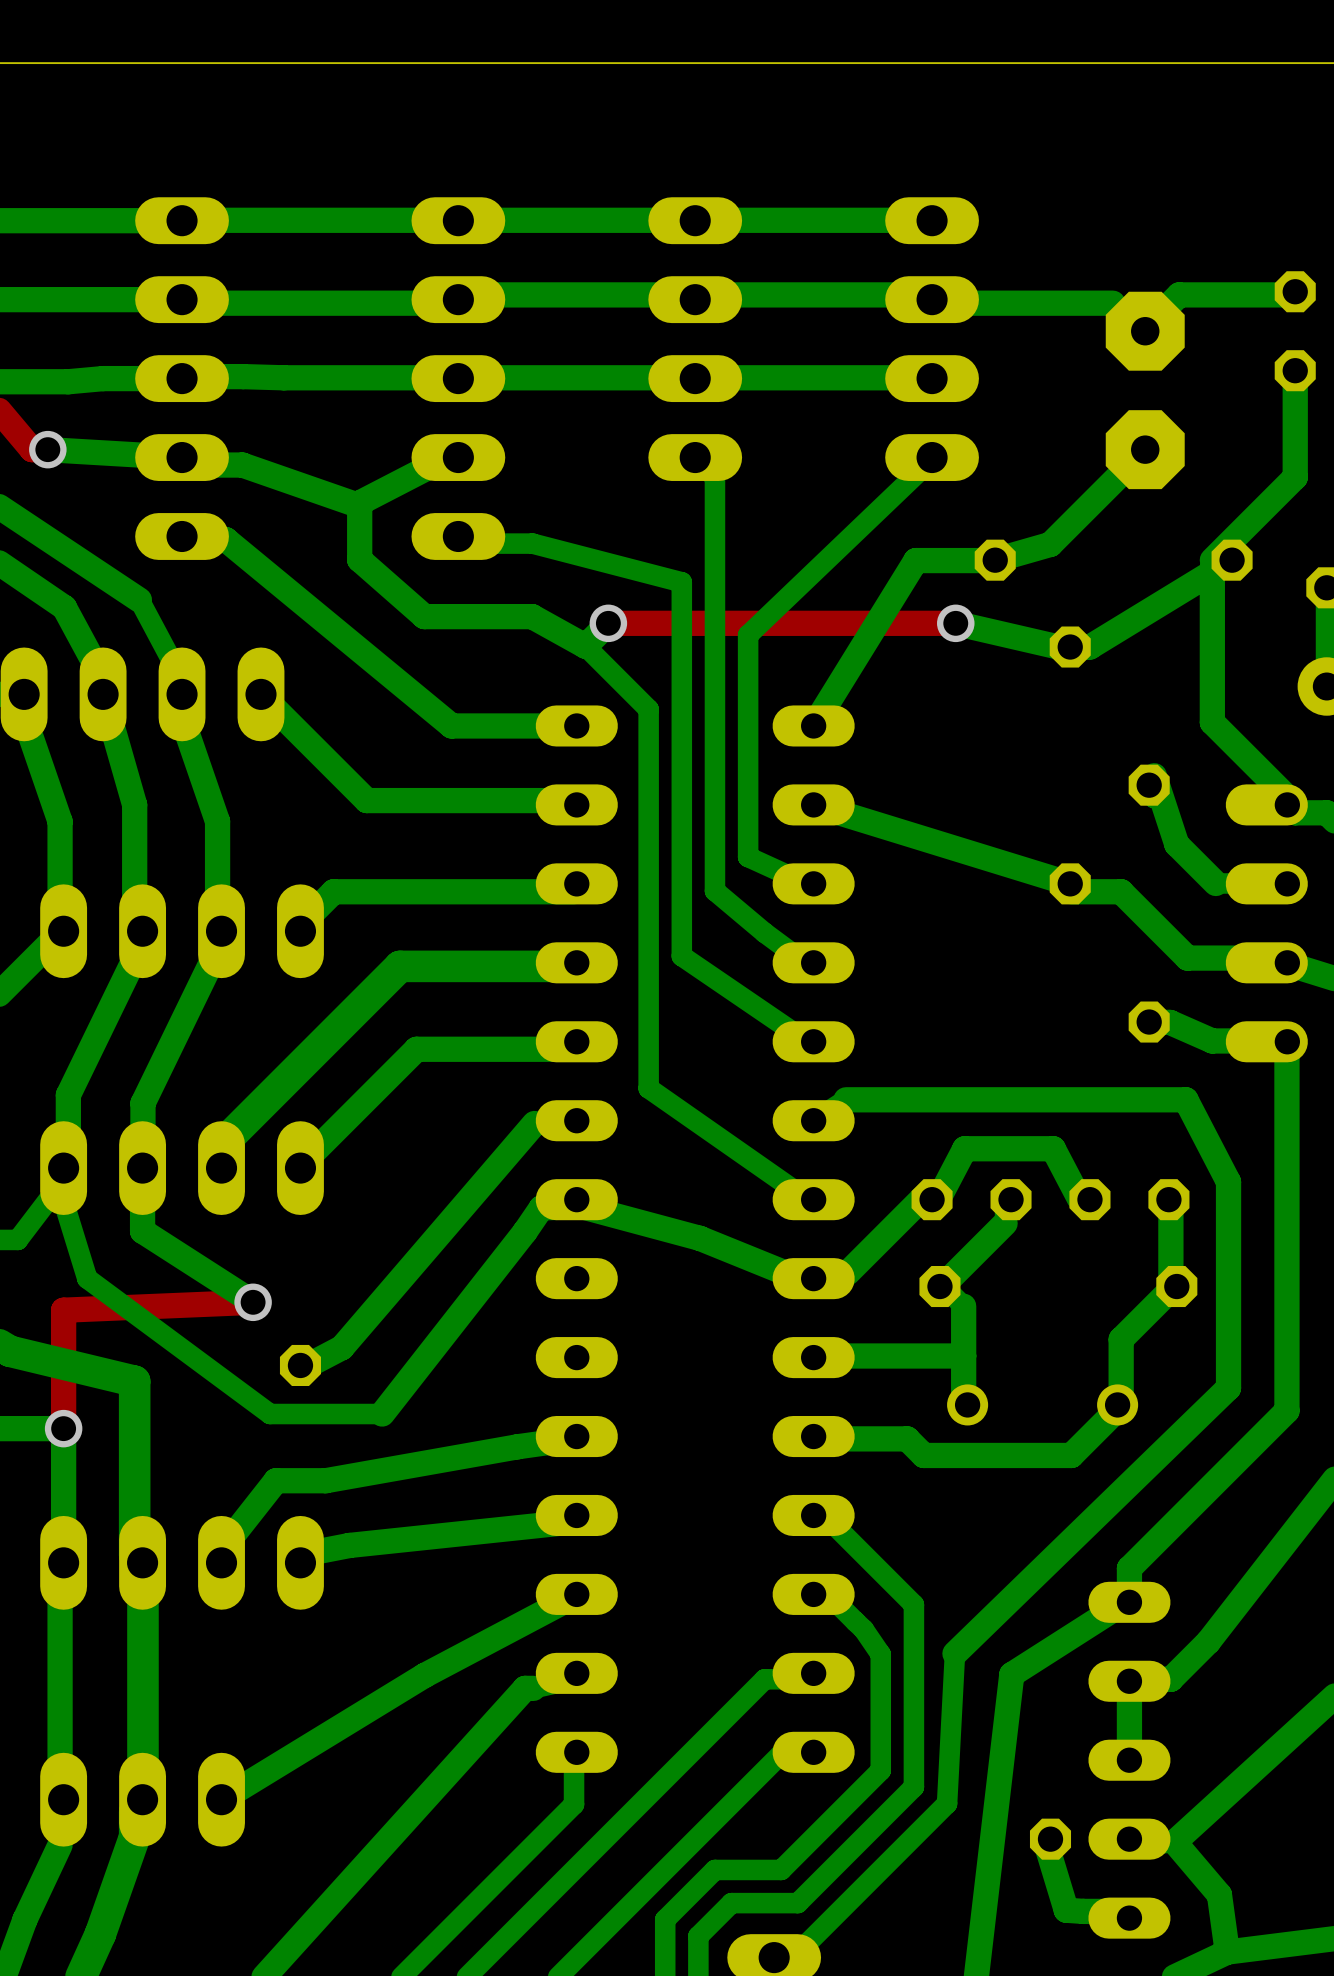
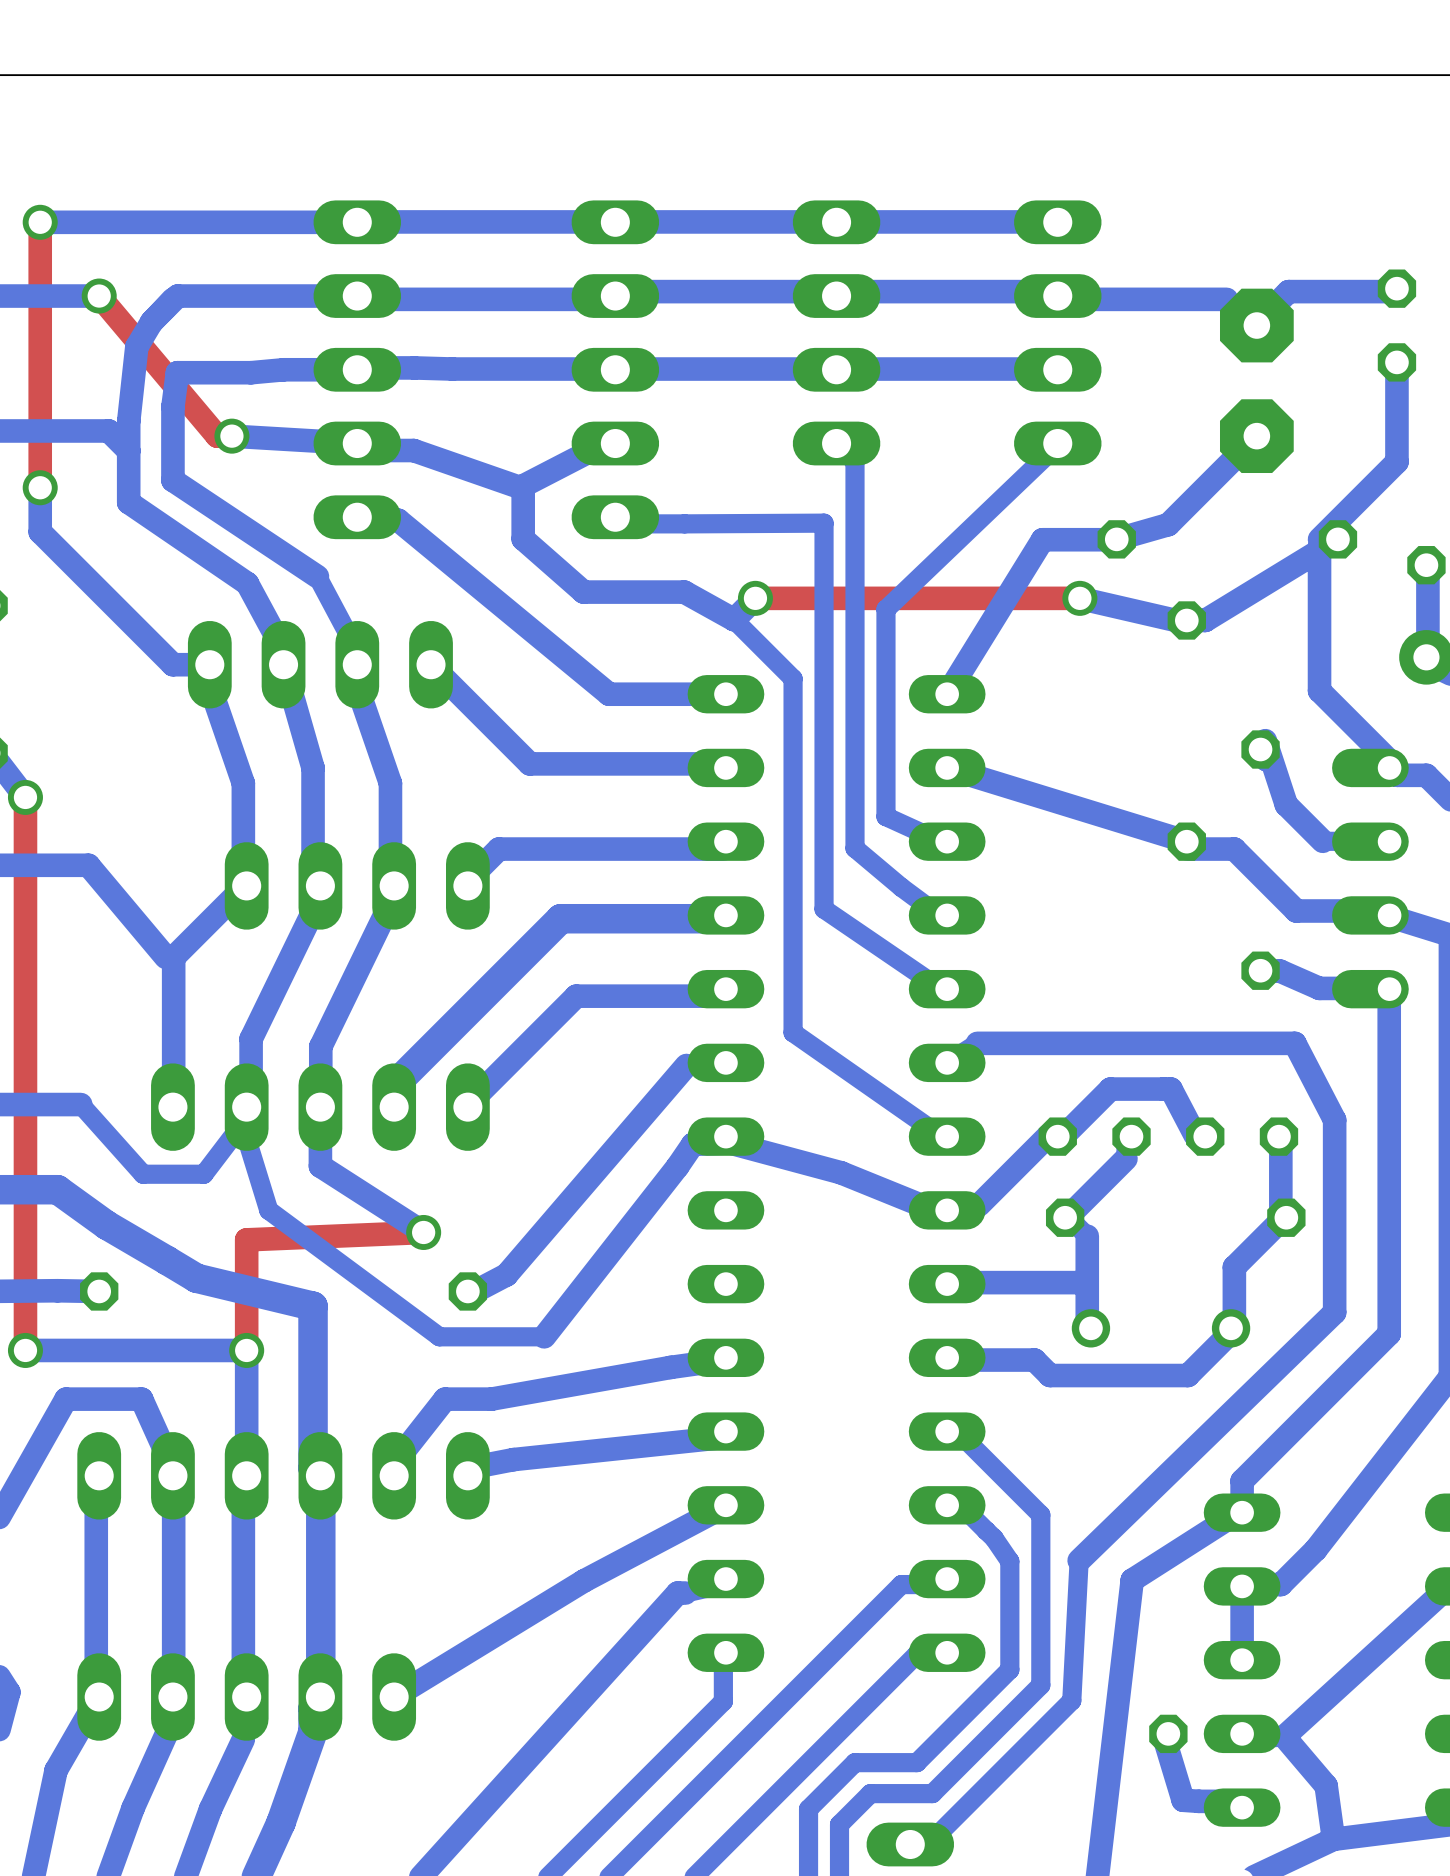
bottom track: (532, 543) (681, 582) -> (684, 523) (824, 523) (824, 560)
bottom track: (988, 1148) (964, 1148) (938, 1198) -> (1110, 1089) (1064, 1135)

